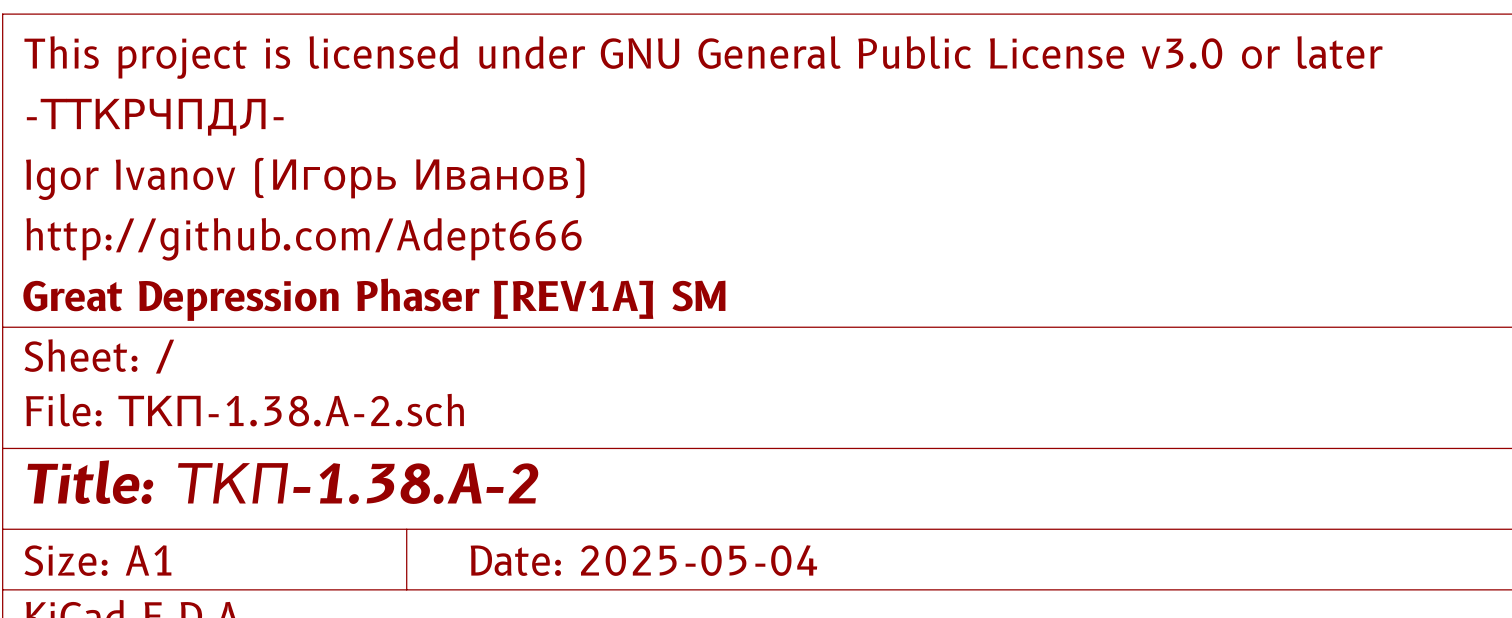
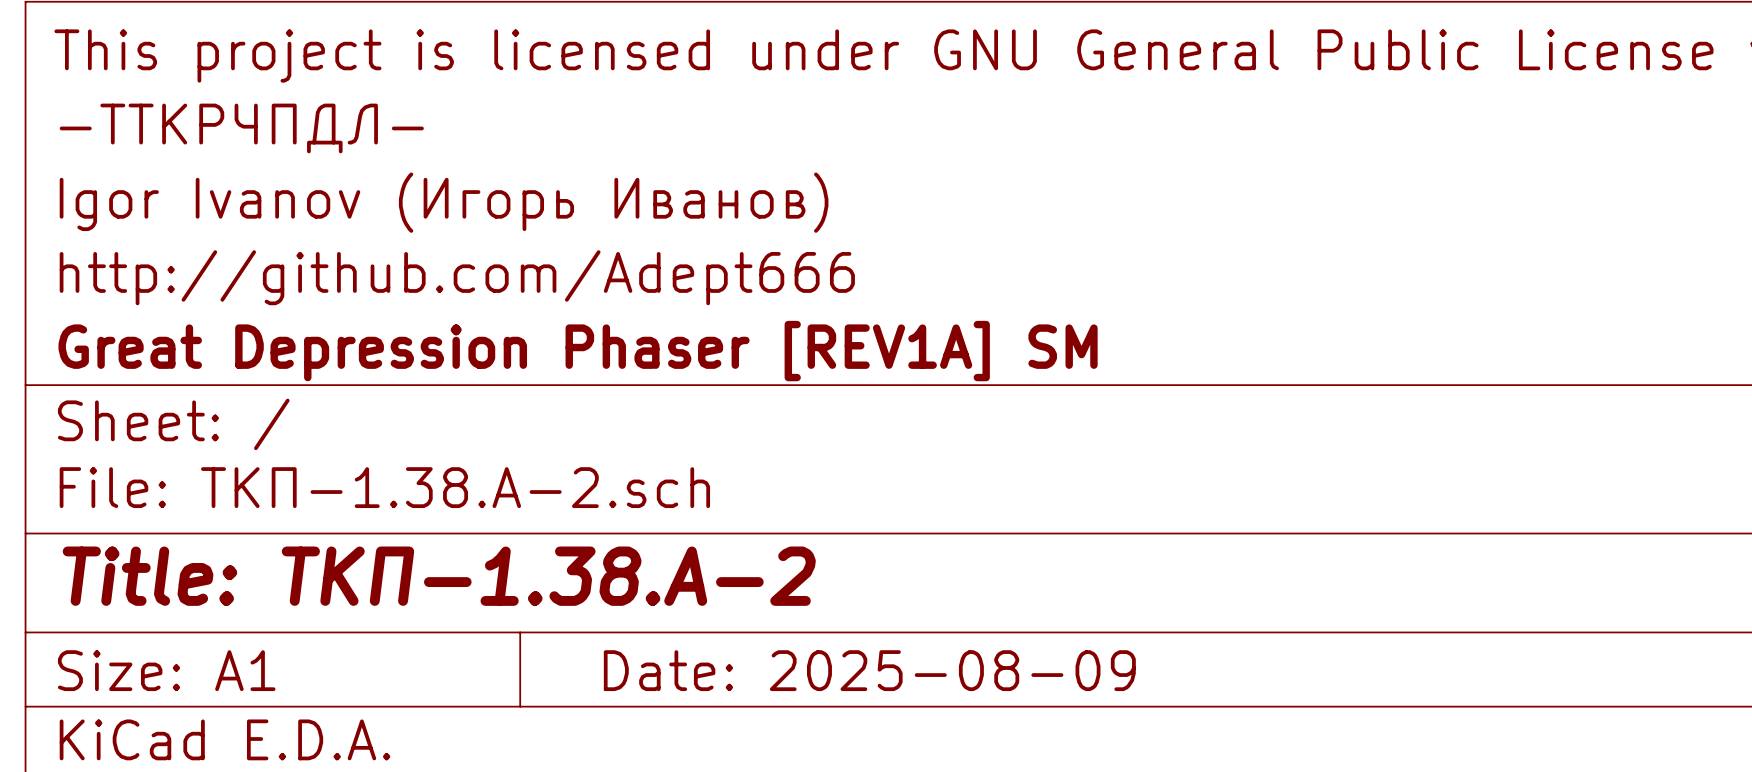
title block: Date: 2025-05-04 (643, 560) -> Date: 2025-08-09 (869, 670)

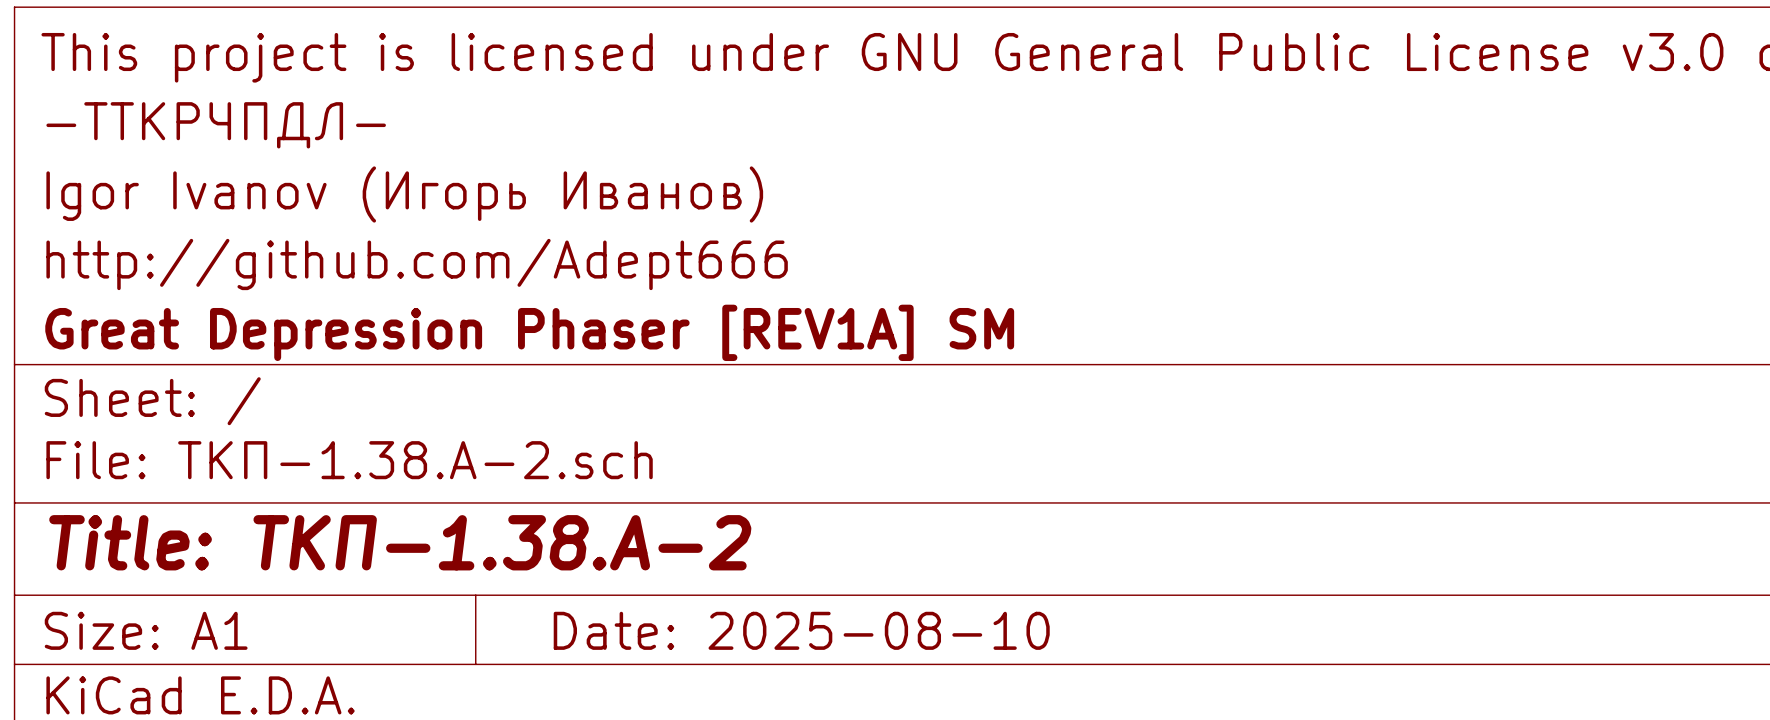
title block: Date: 2025-08-09 (869, 670) -> Date: 2025-08-10 (801, 630)

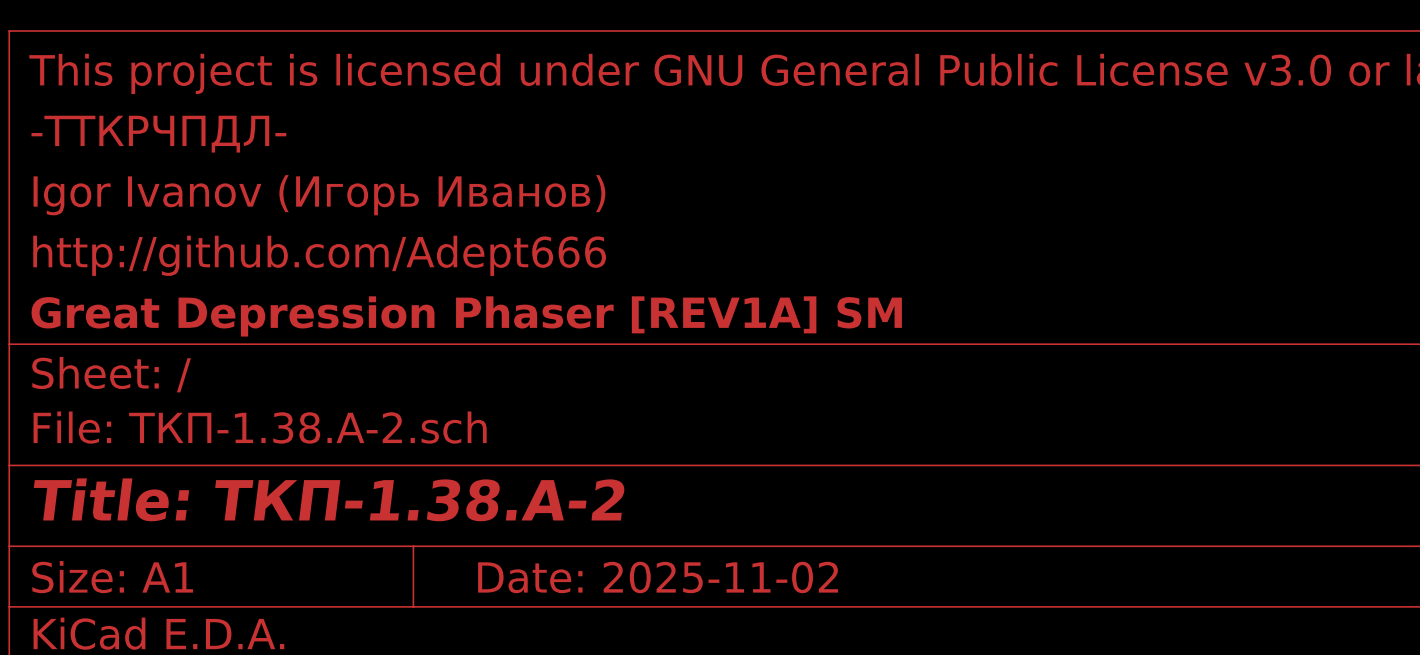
title block: Date: 2025-08-10 (801, 630) -> Date: 2025-11-02 (658, 577)

